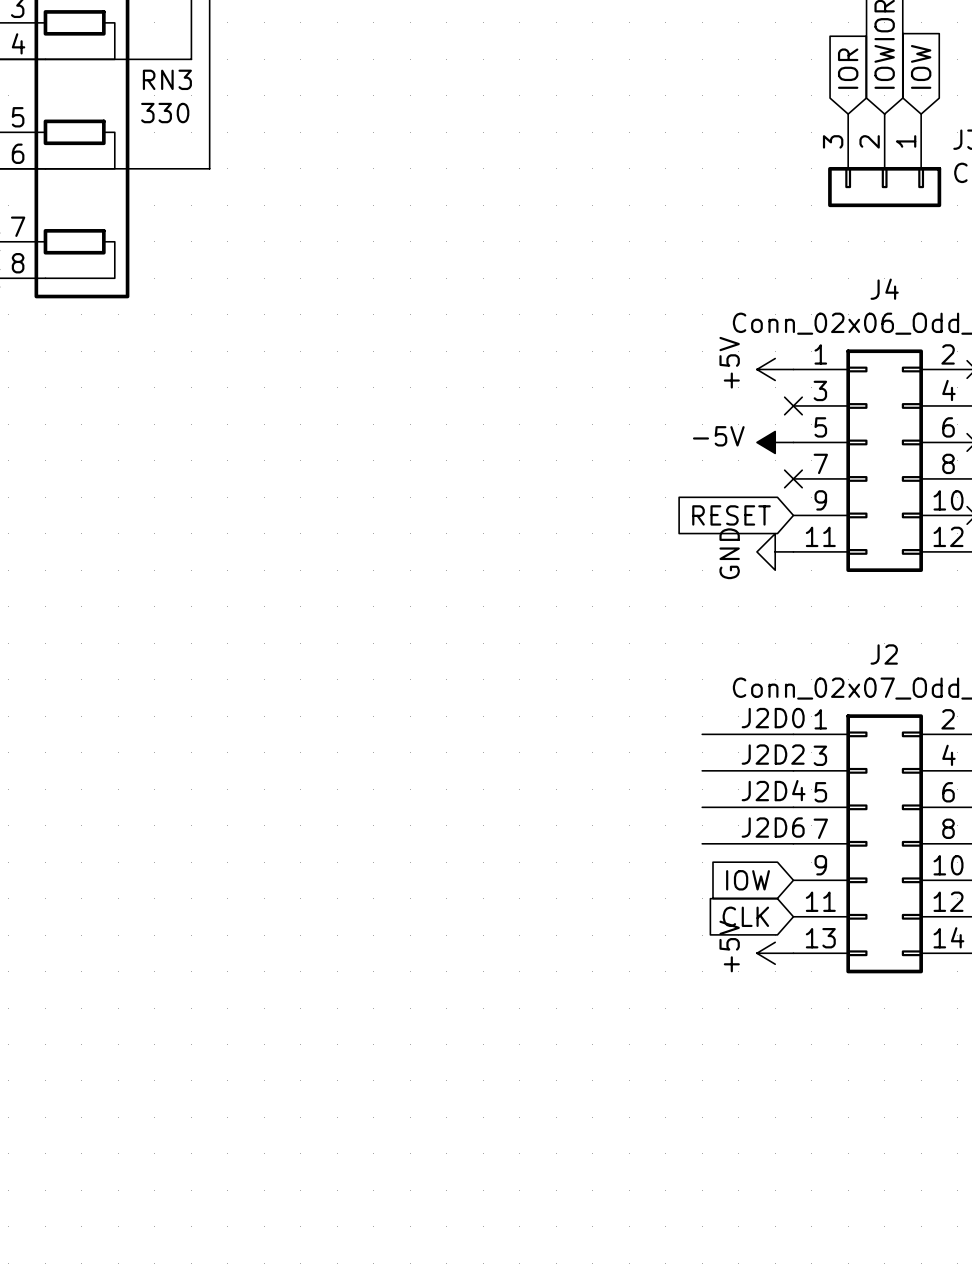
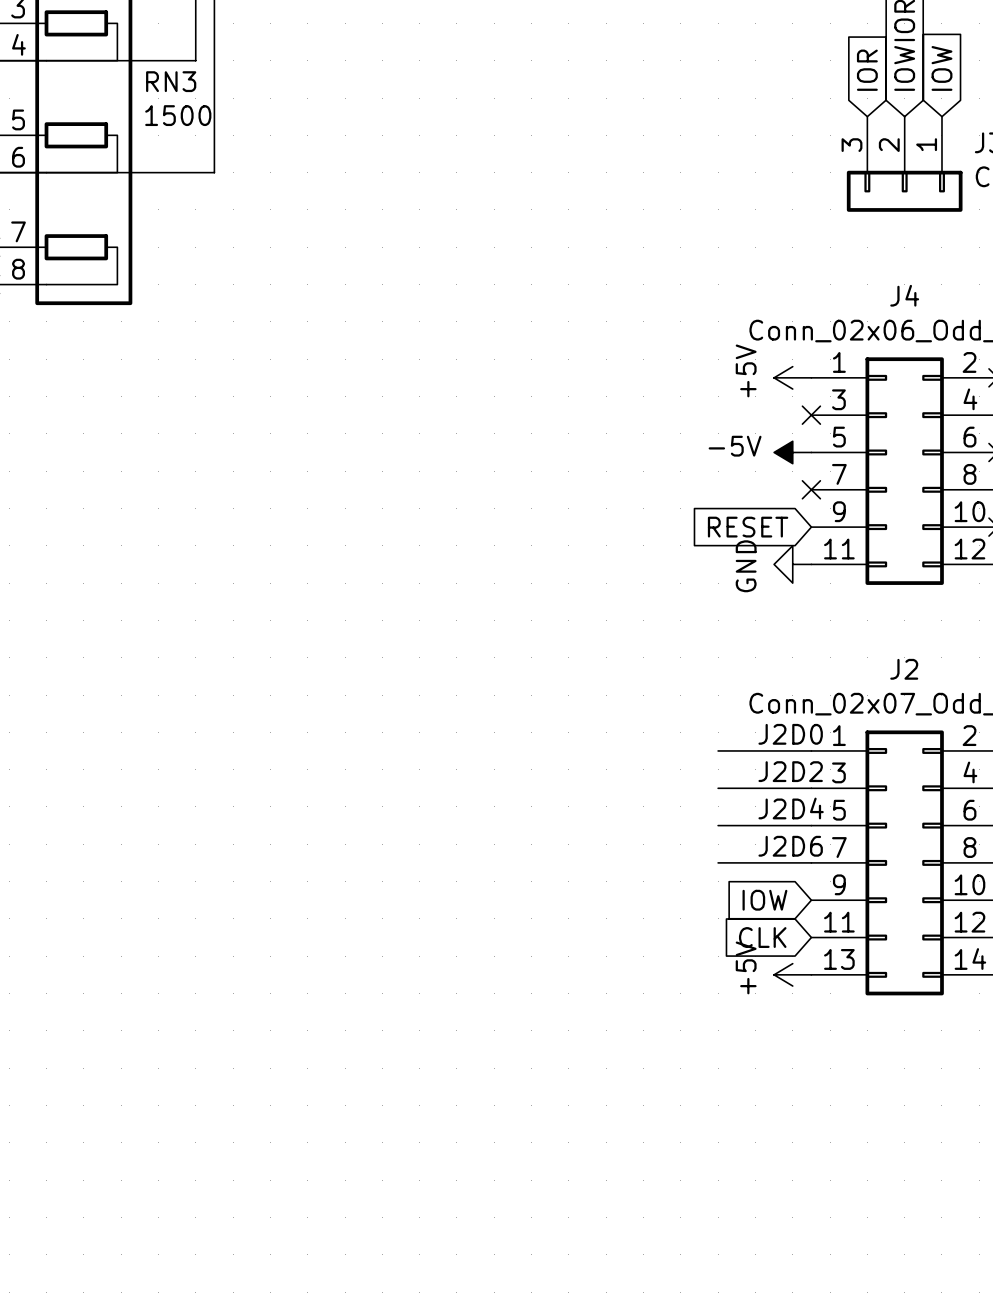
RN3 value: 330 (165, 113) -> 1500 (178, 115)

